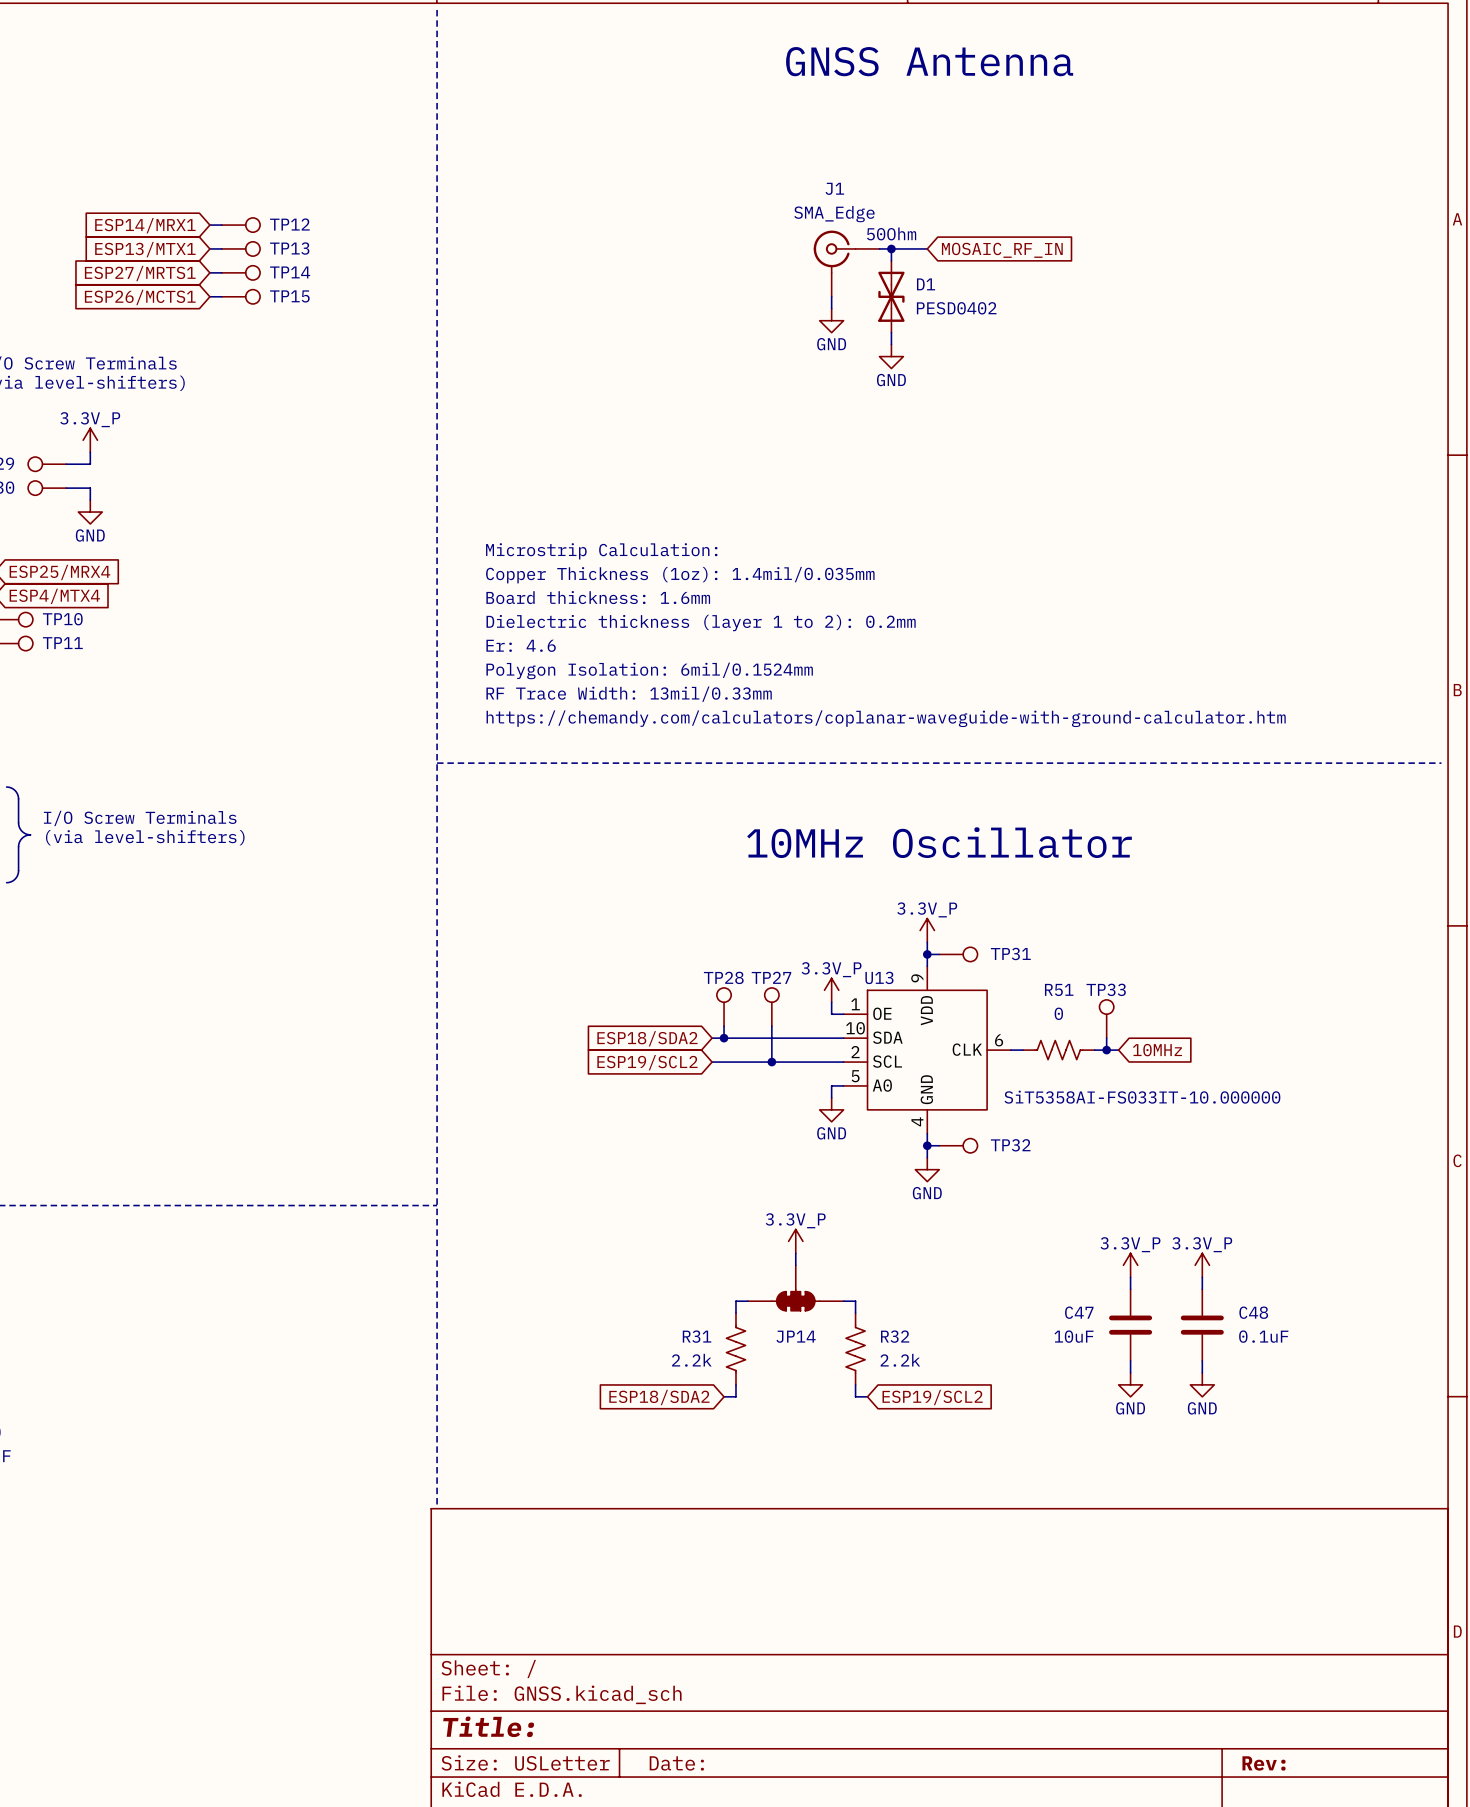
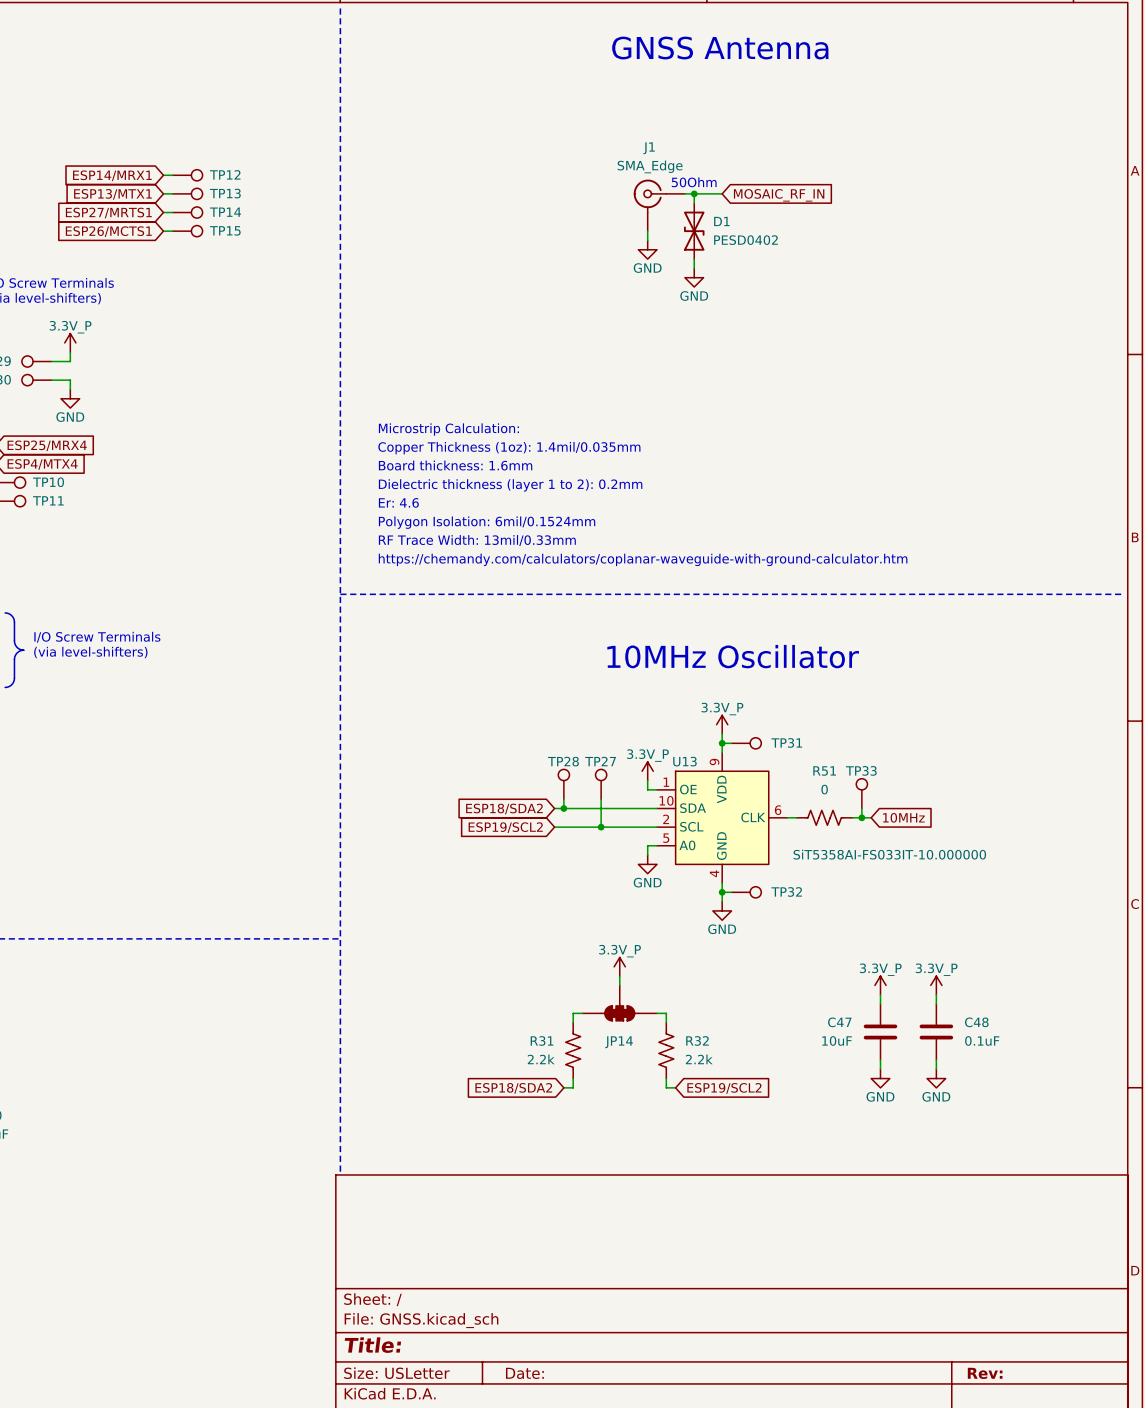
U13 symbol: [843, 966, 1012, 1134] -> [657, 752, 788, 884]

